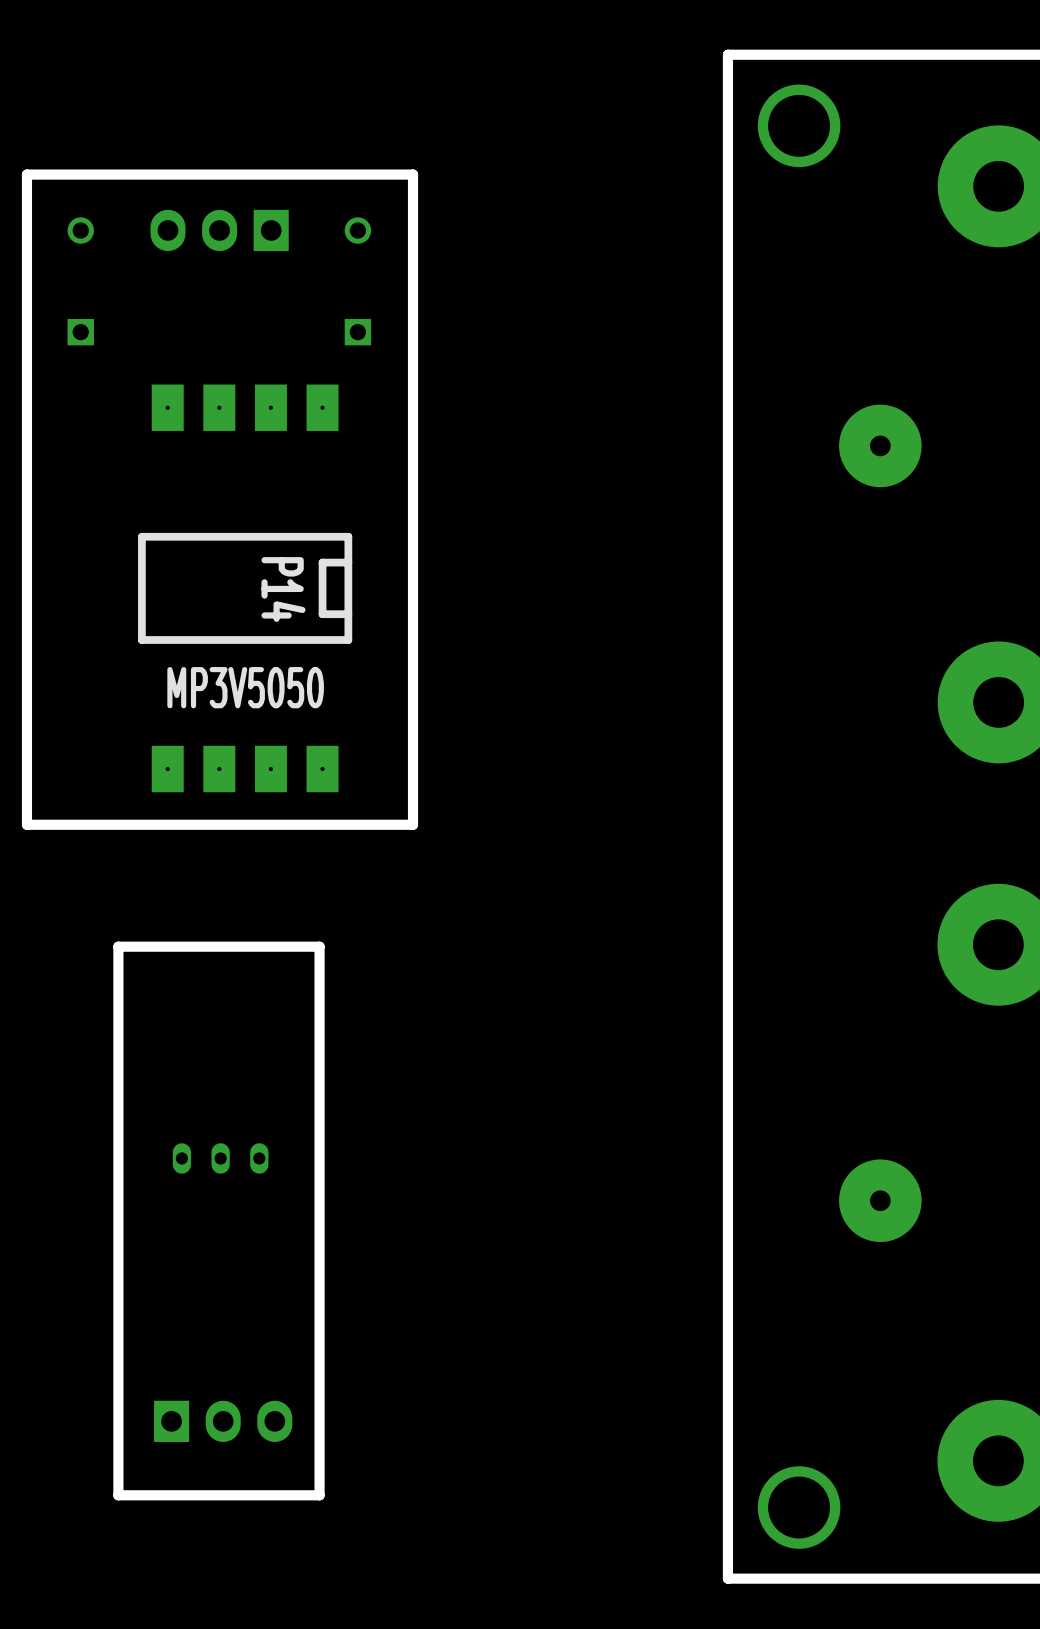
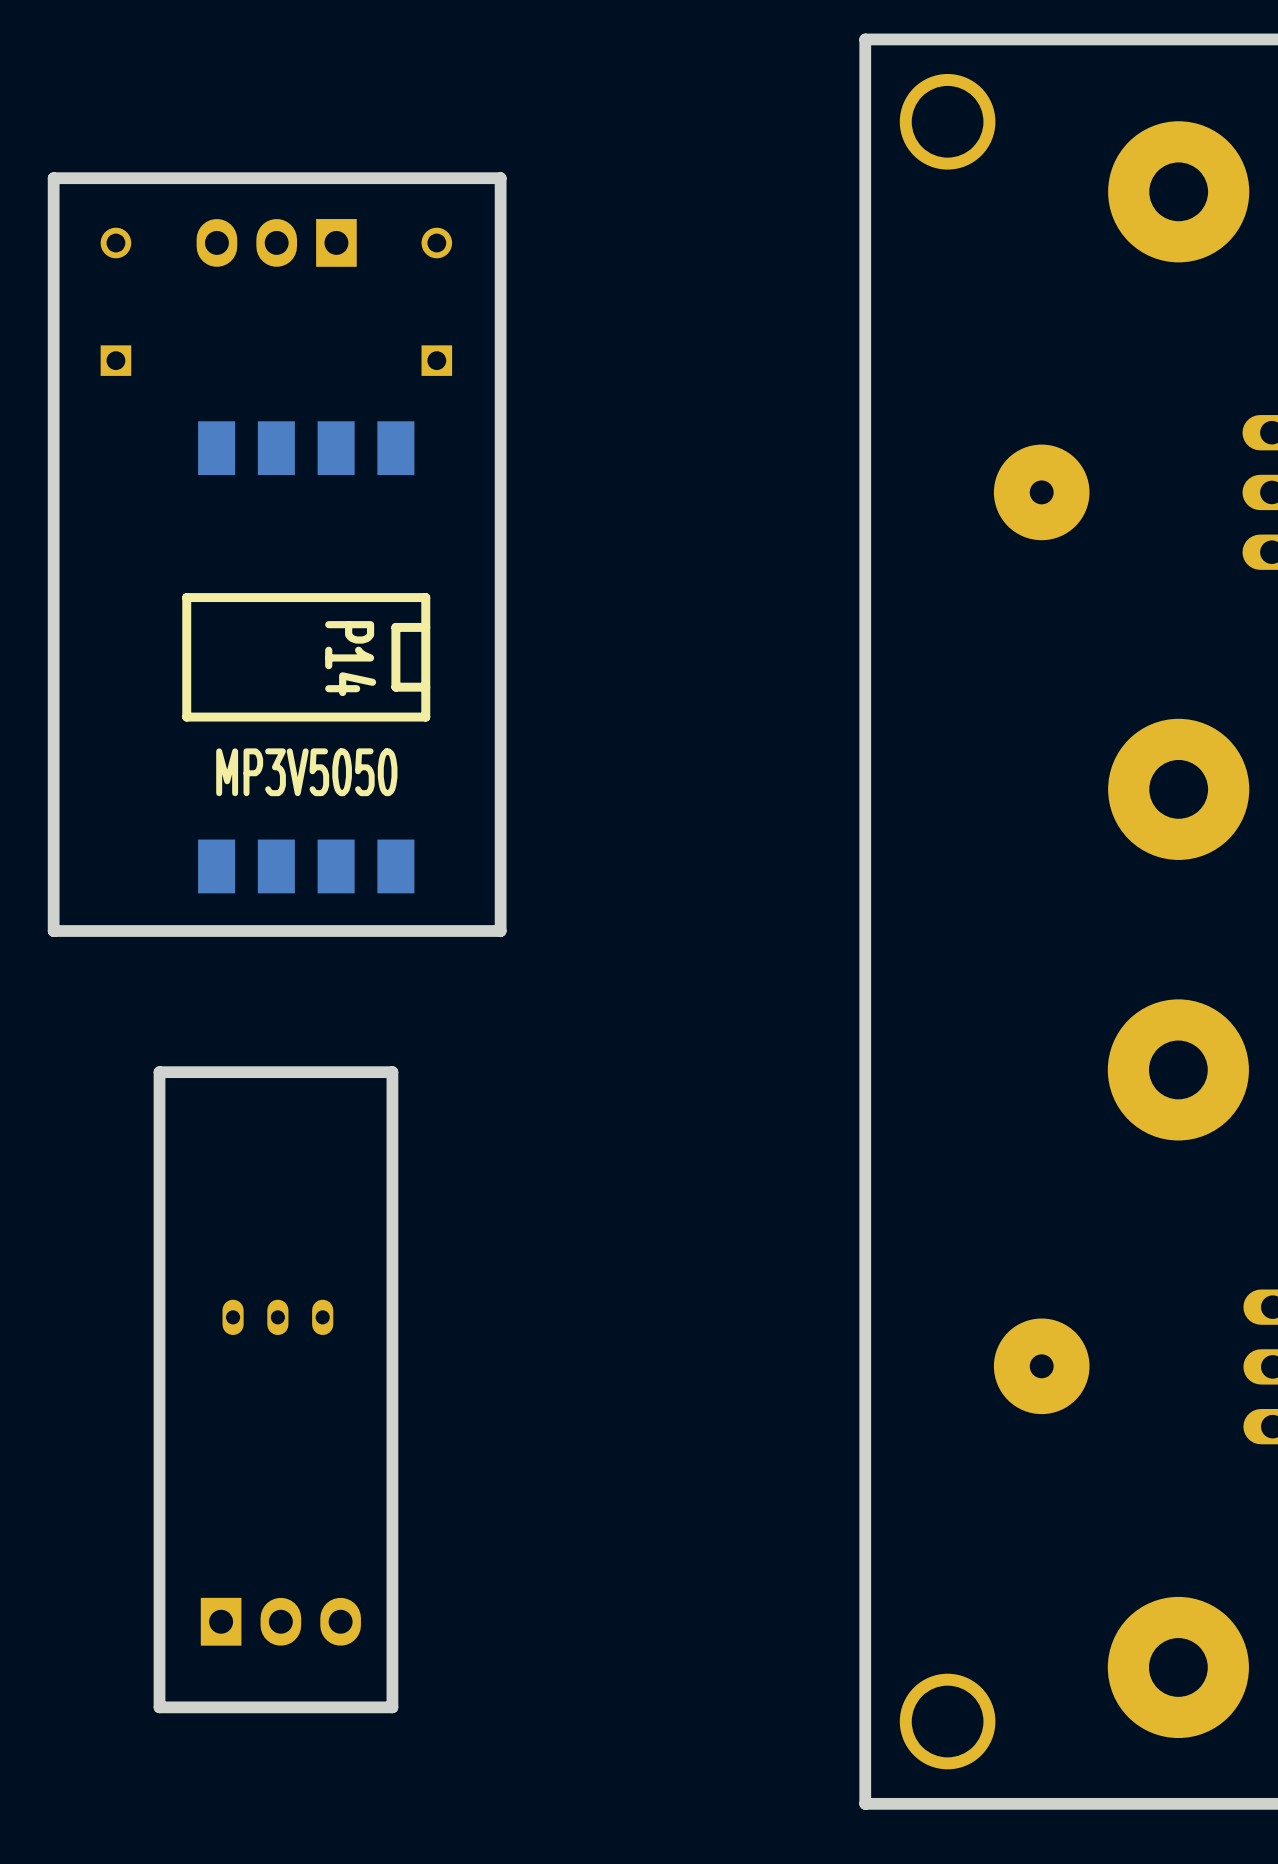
P14 footprint: [138, 384, 353, 793] -> [182, 421, 431, 894]

